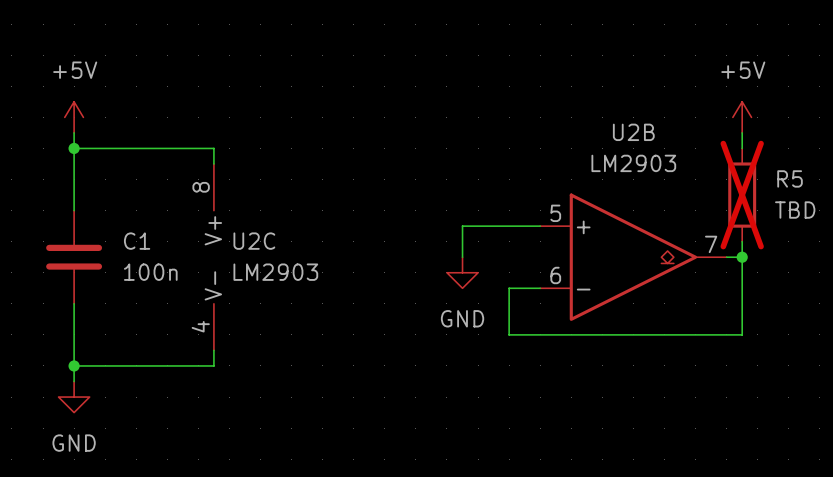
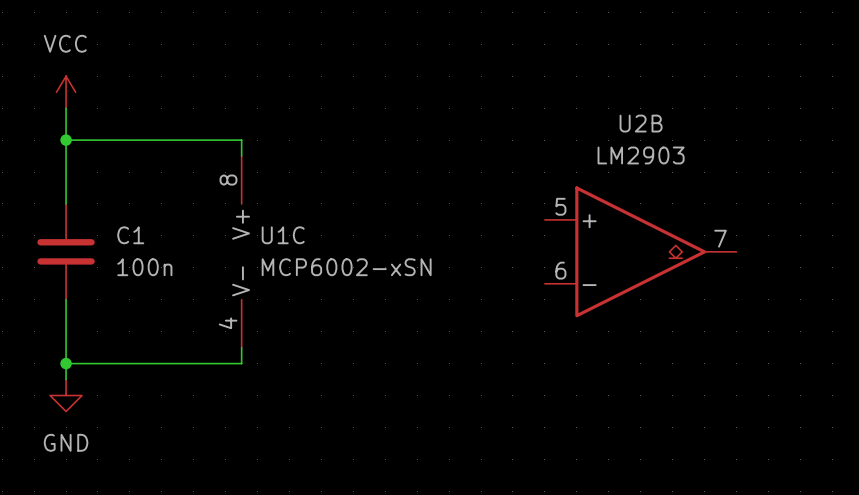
power symbol: none -> VCC (66, 92)
power symbol: +5V (74, 117) -> none
power symbol: +5V (742, 117) -> none
wire: (742, 132) (742, 148) -> none
wire: (213, 148) (213, 163) -> (209, 140) (241, 140) (241, 156)
R5: TBD (742, 195) -> none
wire: (540, 226) (462, 226) (462, 257) -> none
wire: (742, 241) (742, 334) (509, 334) (509, 288) (540, 288) -> none
U2C: LM2903 (213, 257) -> none
U1C: none -> MCP6002-xSN (241, 251)
wire: (726, 257) (742, 257) -> none
junction: (742, 257) -> none
power symbol: GND (462, 272) -> none
wire: (213, 350) (213, 365) -> (241, 347) (241, 363) (209, 363)

